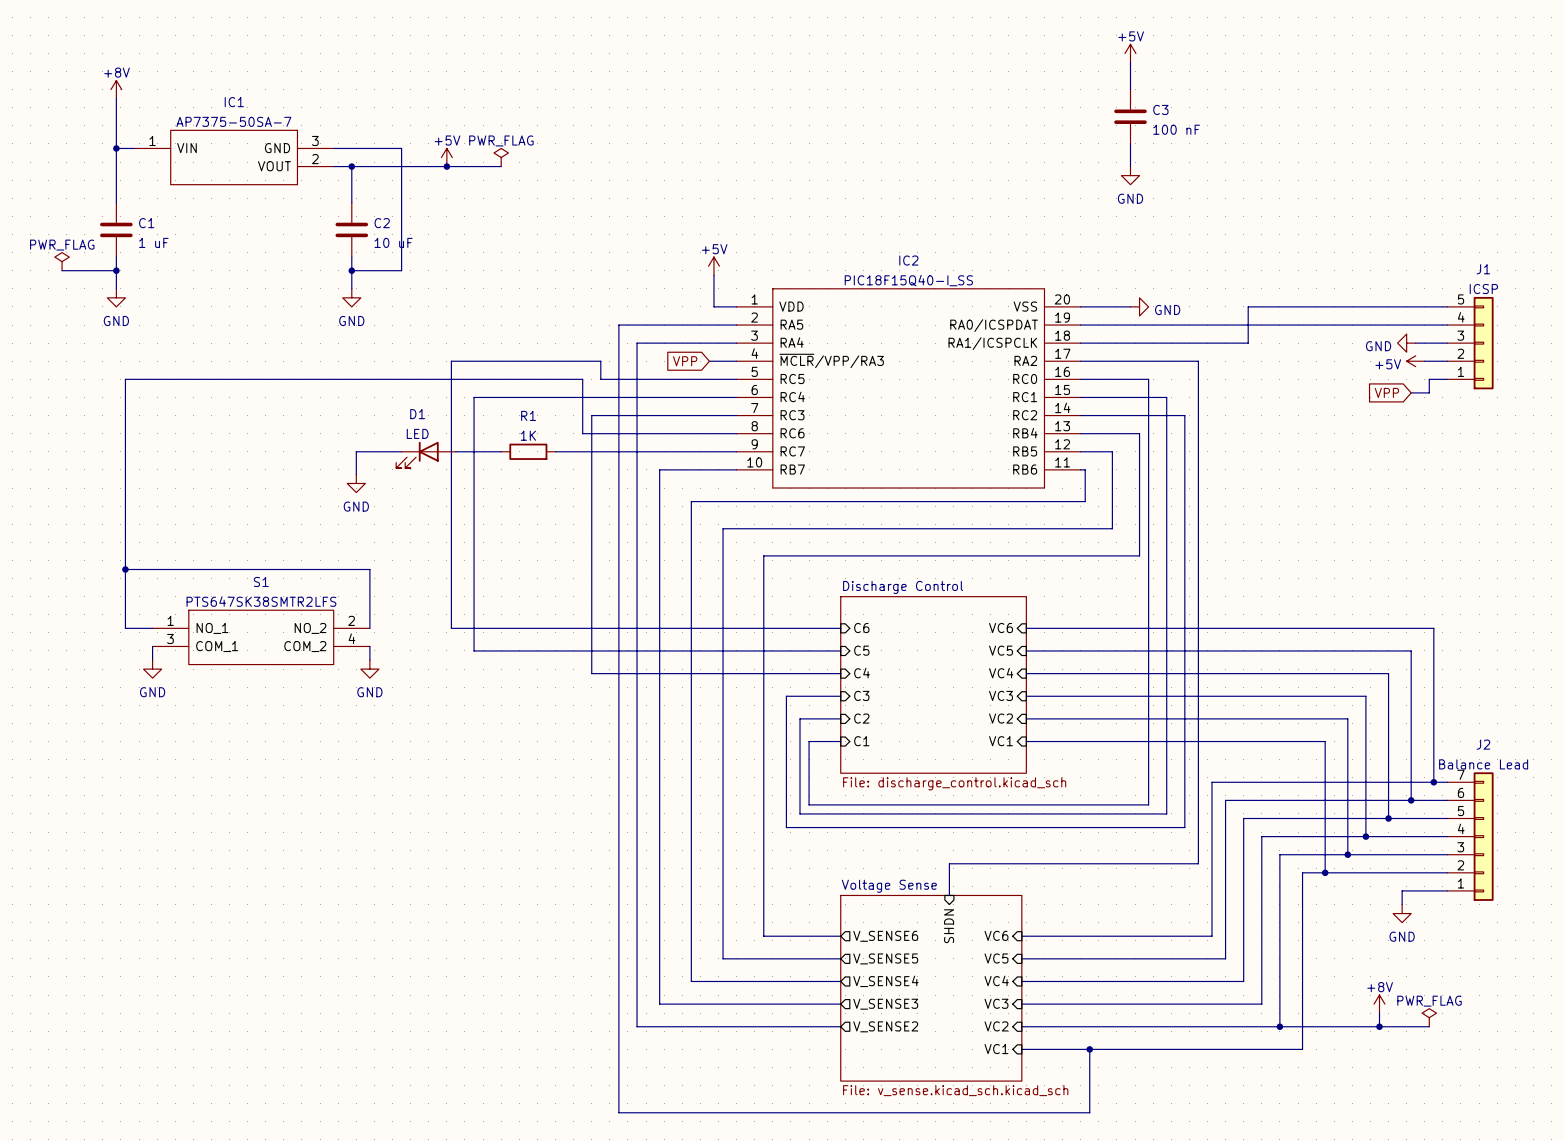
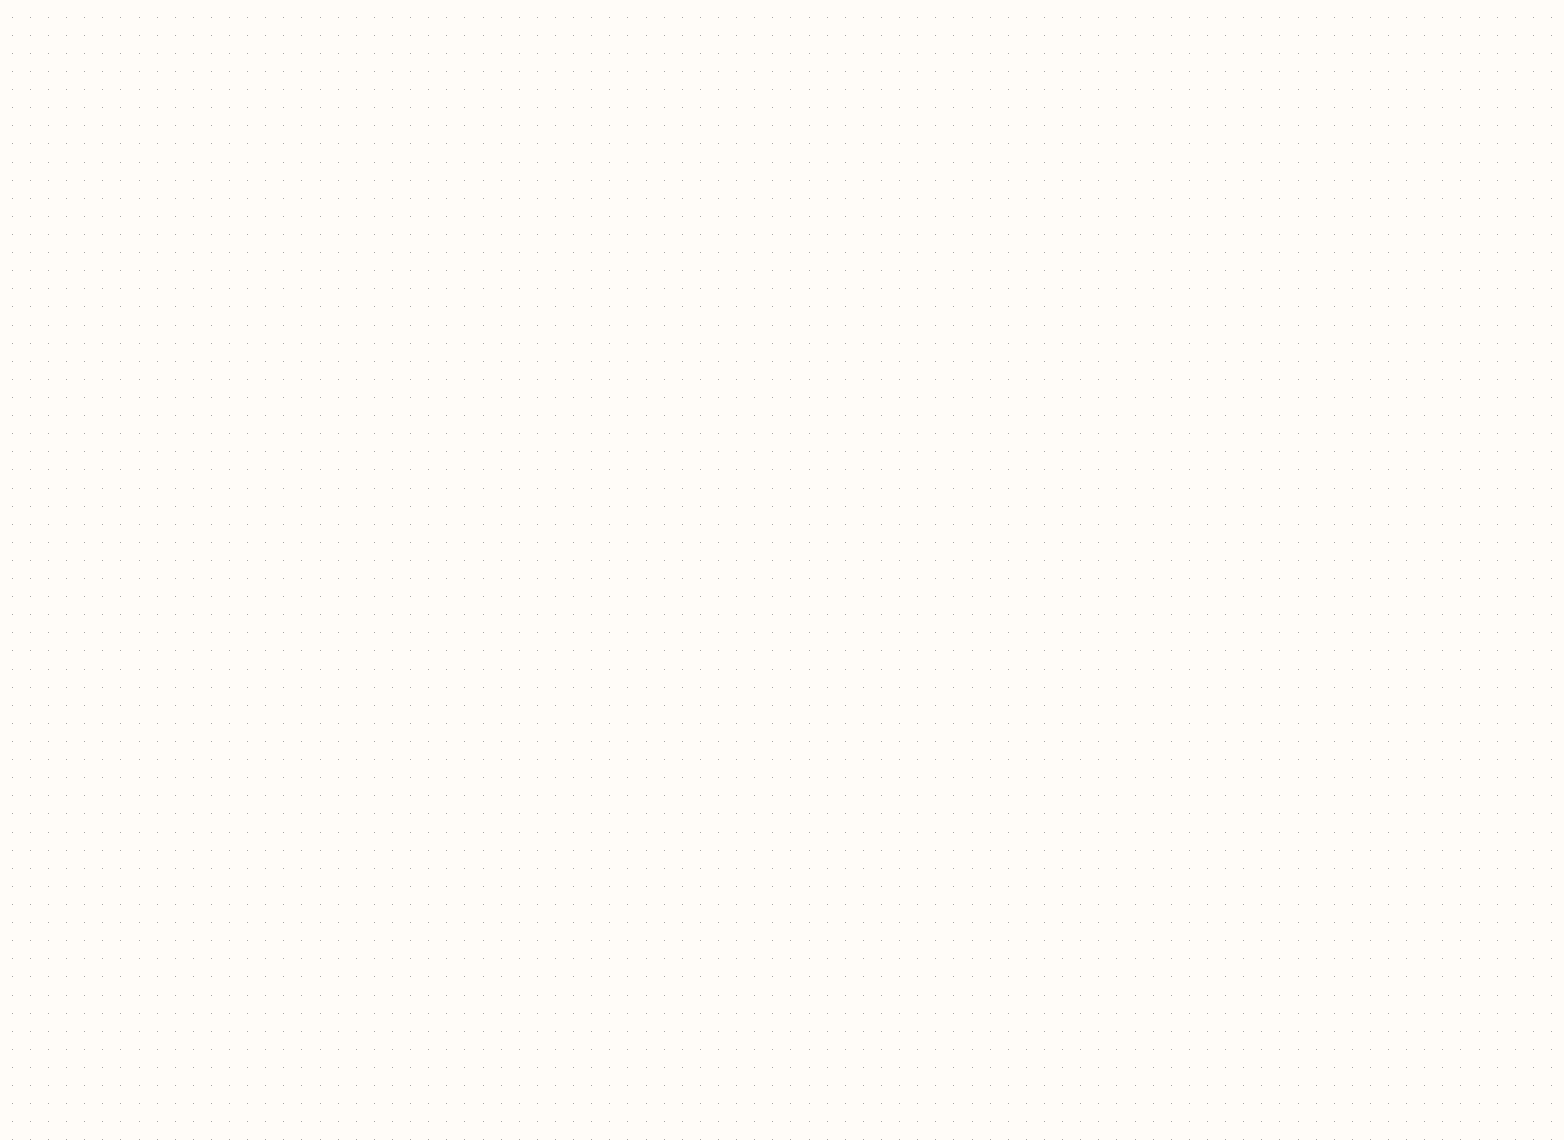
power symbol: +5V (1130, 53) -> none
wire: (1130, 62) (1130, 89) -> none
power symbol: +8V (116, 89) -> none
wire: (116, 98) (116, 148) -> none
C3: 100 nF (1130, 116) -> none
wire: (1130, 143) (1130, 166) -> none
wire: (116, 148) (116, 202) -> none
wire: (116, 148) (134, 148) -> none
junction: (116, 148) -> none
wire: (333, 148) (401, 148) (401, 270) (351, 270) -> none
IC1: AP7375-50SA-7 (234, 157) -> none
power symbol: +5V (446, 157) -> none
power symbol: PWR_FLAG (501, 157) -> none
wire: (333, 166) (501, 166) -> none
wire: (351, 166) (351, 202) -> none
junction: (351, 166) -> none
junction: (446, 166) -> none
power symbol: GND (1130, 175) -> none
C1: 1 uF (116, 229) -> none
C2: 10 uF (351, 229) -> none
wire: (116, 257) (116, 288) -> none
wire: (351, 257) (351, 288) -> none
power symbol: PWR_FLAG (62, 261) -> none
power symbol: +5V (713, 266) -> none
wire: (62, 270) (116, 270) -> none
junction: (116, 270) -> none
junction: (351, 270) -> none
wire: (713, 275) (713, 306) (736, 306) -> none
power symbol: GND (116, 297) -> none
power symbol: GND (351, 297) -> none
wire: (1080, 306) (1130, 306) -> none
power symbol: GND (1139, 306) -> none
wire: (1447, 306) (1248, 306) (1248, 343) (1080, 343) -> none
wire: (736, 325) (618, 325) (618, 1112) (1089, 1112) (1089, 1049) -> none
wire: (1080, 325) (1447, 325) -> none
wire: (736, 343) (637, 343) (637, 1026) (840, 1026) -> none
power symbol: GND (1406, 343) -> none
wire: (1415, 343) (1447, 343) -> none
J1: ICSP (1470, 343) -> none
global label: VPP (685, 361) -> none
wire: (709, 361) (736, 361) -> none
wire: (1080, 361) (1198, 361) (1198, 863) (949, 863) (949, 895) -> none
power symbol: +5V (1415, 361) -> none
wire: (1424, 361) (1447, 361) -> none
wire: (736, 379) (600, 379) (600, 361) (451, 361) (451, 628) (840, 628) -> none
wire: (1080, 379) (1148, 379) (1148, 804) (809, 804) (809, 741) (840, 741) -> none
wire: (1447, 379) (1429, 379) (1429, 392) (1411, 392) -> none
IC2: PIC18F15Q40-I_SS (908, 388) -> none
global label: VPP (1386, 392) -> none
wire: (736, 397) (474, 397) (474, 650) (840, 650) -> none
wire: (1080, 397) (1166, 397) (1166, 813) (800, 813) (800, 718) (840, 718) -> none
wire: (736, 415) (591, 415) (591, 673) (840, 673) -> none
wire: (1080, 415) (1184, 415) (1184, 827) (786, 827) (786, 696) (840, 696) -> none
wire: (736, 433) (582, 433) (582, 379) (125, 379) (125, 628) (152, 628) -> none
wire: (1080, 433) (1139, 433) (1139, 555) (763, 555) (763, 936) (840, 936) -> none
wire: (401, 451) (356, 451) (356, 474) -> none
wire: (455, 451) (501, 451) -> none
R1: 1K (528, 451) -> none
wire: (555, 451) (736, 451) -> none
wire: (1080, 451) (1112, 451) (1112, 528) (723, 528) (723, 958) (840, 958) -> none
D1: LED (426, 454) -> none
wire: (736, 469) (659, 469) (659, 1004) (840, 1004) -> none
wire: (1080, 469) (1085, 469) (1085, 501) (691, 501) (691, 981) (840, 981) -> none
power symbol: GND (356, 483) -> none
wire: (125, 569) (369, 569) (369, 628) -> none
junction: (125, 569) -> none
sheet pin: C6 (861, 628) -> none
sheet pin: VC6 (1001, 628) -> none
wire: (1026, 628) (1433, 628) (1433, 782) -> none
S1: PTS647SK38SMTR2LFS (261, 637) -> none
wire: (152, 646) (152, 660) -> none
wire: (369, 646) (369, 660) -> none
sheet pin: C5 (861, 650) -> none
sheet pin: VC5 (1001, 650) -> none
wire: (1026, 650) (1411, 650) (1411, 800) -> none
power symbol: GND (152, 669) -> none
power symbol: GND (369, 669) -> none
sheet pin: C4 (862, 673) -> none
sheet pin: VC4 (1001, 673) -> none
wire: (1026, 673) (1388, 673) (1388, 818) -> none
sheet Discharge Control: File: discharge_control.kicad_sch (933, 684) -> none
sheet pin: C3 (861, 695) -> none
sheet pin: VC3 (1001, 695) -> none
wire: (1026, 696) (1365, 696) (1365, 836) -> none
sheet pin: C2 (861, 718) -> none
sheet pin: VC2 (1001, 718) -> none
wire: (1026, 718) (1347, 718) (1347, 854) -> none
sheet pin: C1 (861, 741) -> none
sheet pin: VC1 (1001, 741) -> none
wire: (1026, 741) (1325, 741) (1325, 872) -> none
junction: (1433, 782) -> none
wire: (1447, 782) (1211, 782) (1211, 936) (1021, 936) -> none
junction: (1411, 800) -> none
wire: (1447, 800) (1225, 800) (1225, 958) (1021, 958) -> none
junction: (1388, 818) -> none
wire: (1447, 818) (1243, 818) (1243, 981) (1021, 981) -> none
junction: (1365, 836) -> none
wire: (1447, 836) (1261, 836) (1261, 1004) (1021, 1004) -> none
J2: Balance Lead (1470, 836) -> none
junction: (1347, 854) -> none
wire: (1447, 854) (1279, 854) (1279, 1026) -> none
junction: (1325, 872) -> none
wire: (1447, 872) (1302, 872) (1302, 1049) (1021, 1049) -> none
wire: (1447, 890) (1402, 890) (1402, 904) -> none
power symbol: GND (1402, 913) -> none
sheet pin: SHDN (949, 926) -> none
sheet pin: VC6 (996, 935) -> none
sheet pin: V_SENSE6 (885, 936) -> none
sheet pin: V_SENSE5 (885, 958) -> none
sheet pin: VC5 (996, 958) -> none
sheet pin: VC4 (996, 980) -> none
sheet pin: V_SENSE4 (885, 981) -> none
sheet Voltage Sense: File: v_sense.kicad_sch.kicad_sch (931, 988) -> none
sheet pin: VC3 (996, 1003) -> none
sheet pin: V_SENSE3 (885, 1004) -> none
power symbol: +8V (1379, 1004) -> none
wire: (1379, 1013) (1379, 1026) -> none
power symbol: PWR_FLAG (1429, 1017) -> none
sheet pin: V_SENSE2 (885, 1026) -> none
sheet pin: VC2 (996, 1026) -> none
wire: (1021, 1026) (1429, 1026) -> none
junction: (1279, 1026) -> none
junction: (1379, 1026) -> none
sheet pin: VC1 (996, 1049) -> none
junction: (1089, 1049) -> none

